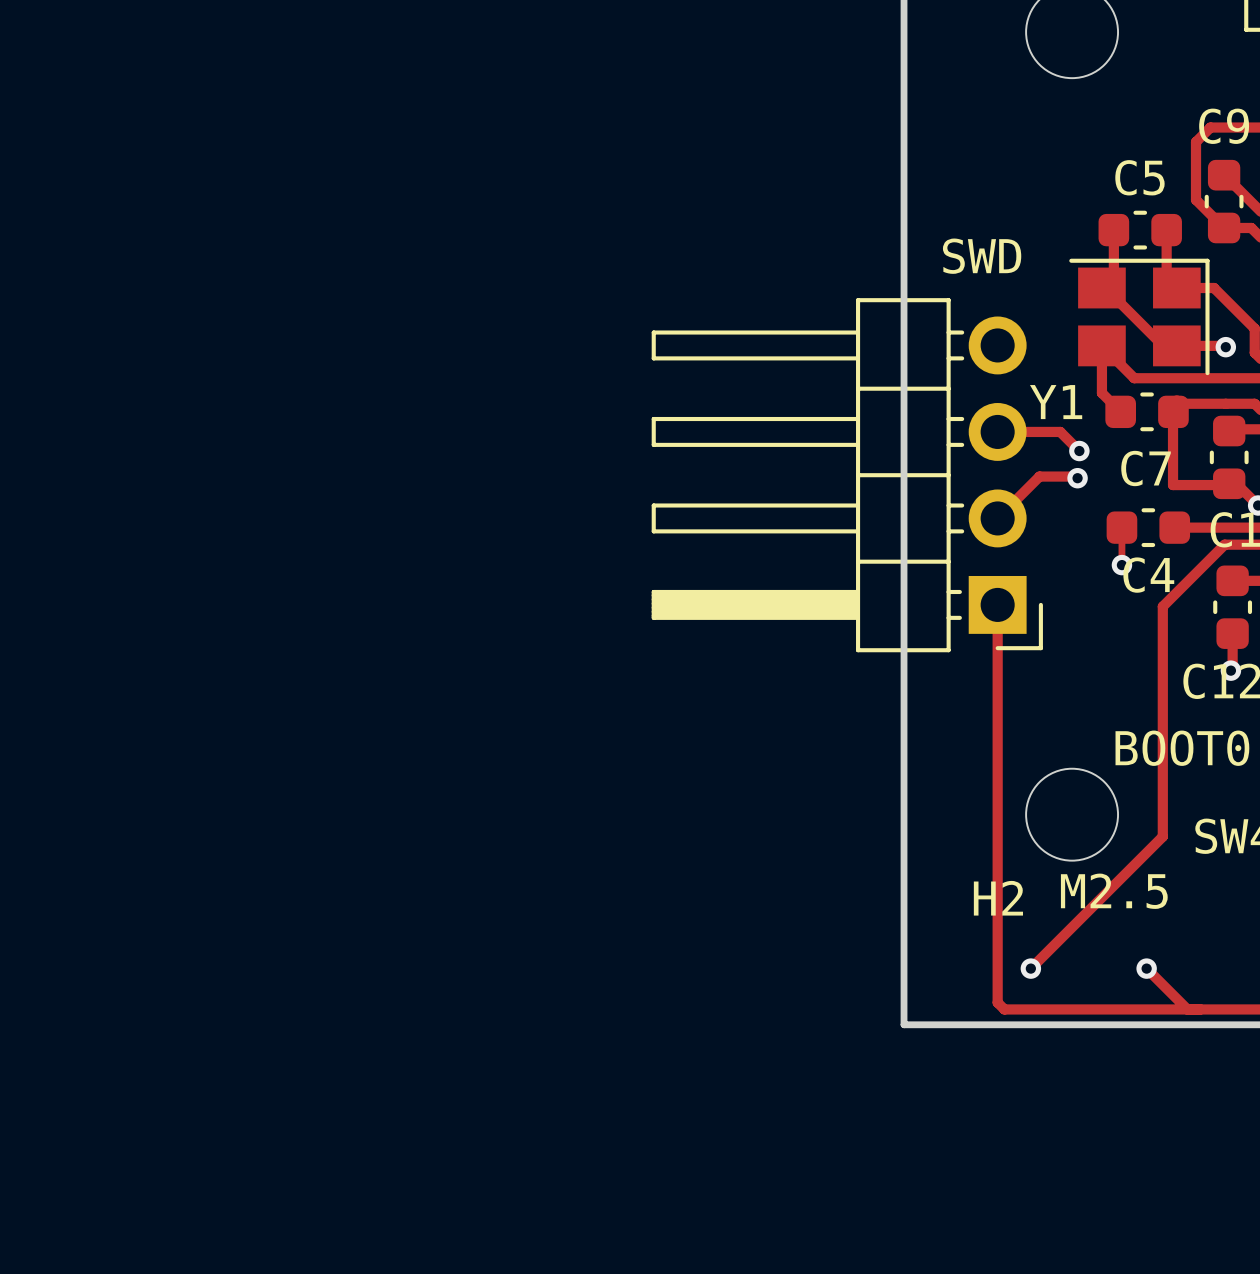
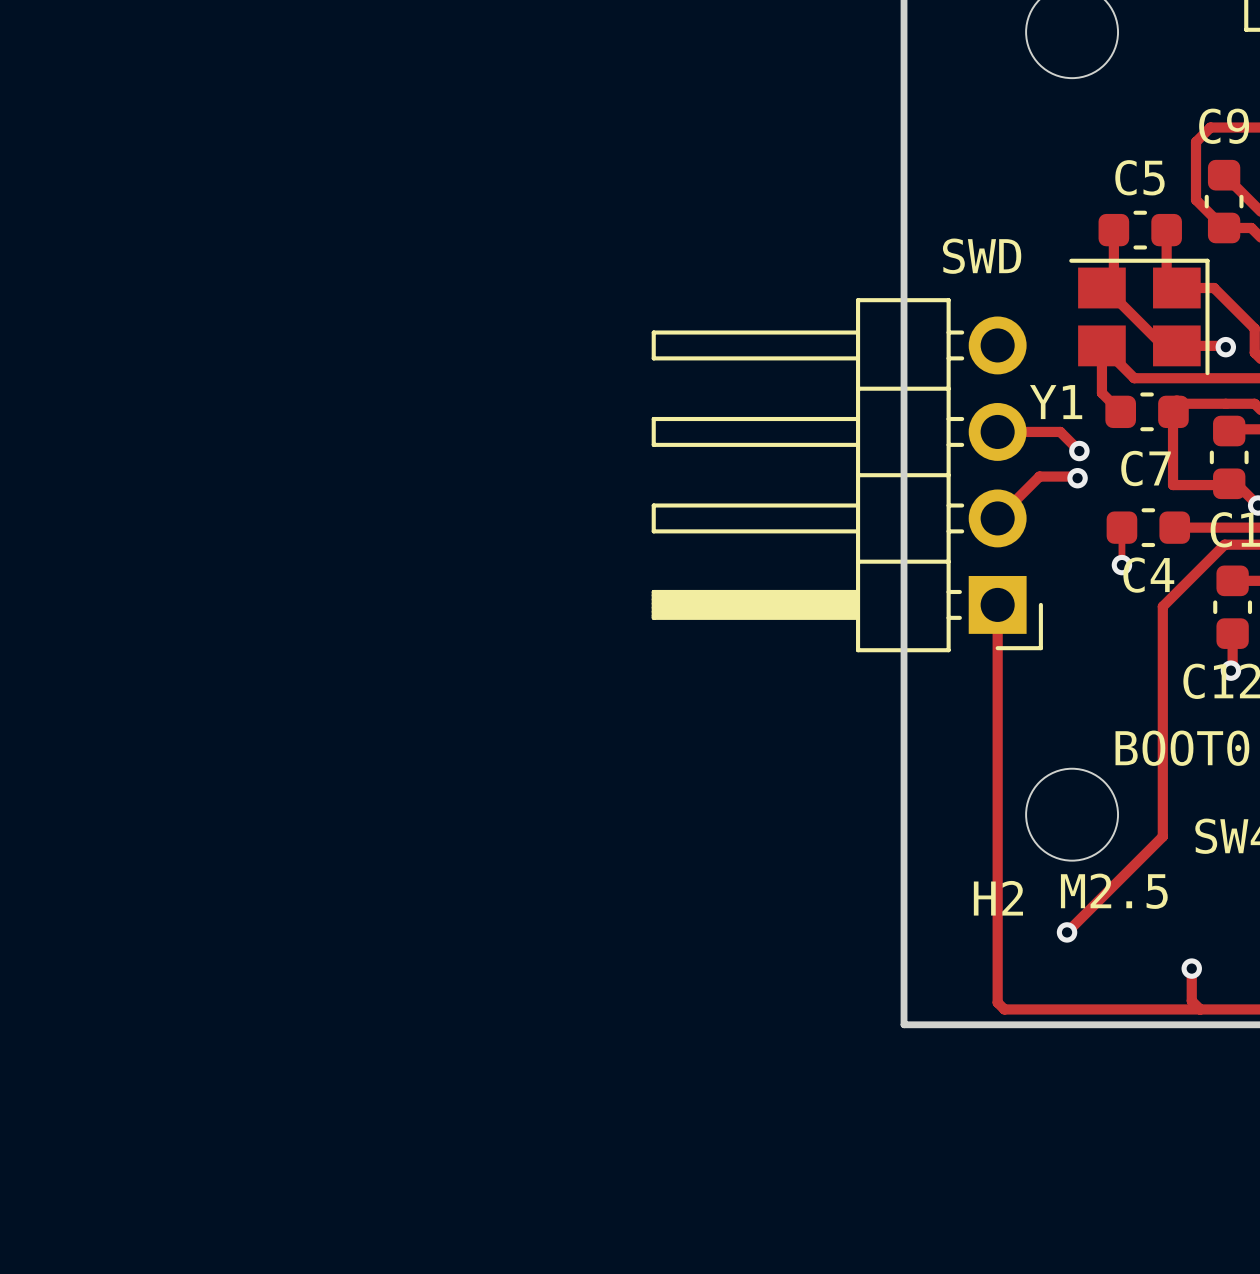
track: (1067, 932) (1030, 968) -> none
via: none -> (1067, 932)
via: (1030, 968) -> none
track: (1146, 968) (1187, 1009) -> none
via: (1146, 968) -> none
track: none -> (1191, 968) (1191, 1000) (1200, 1009)
via: none -> (1191, 968)

